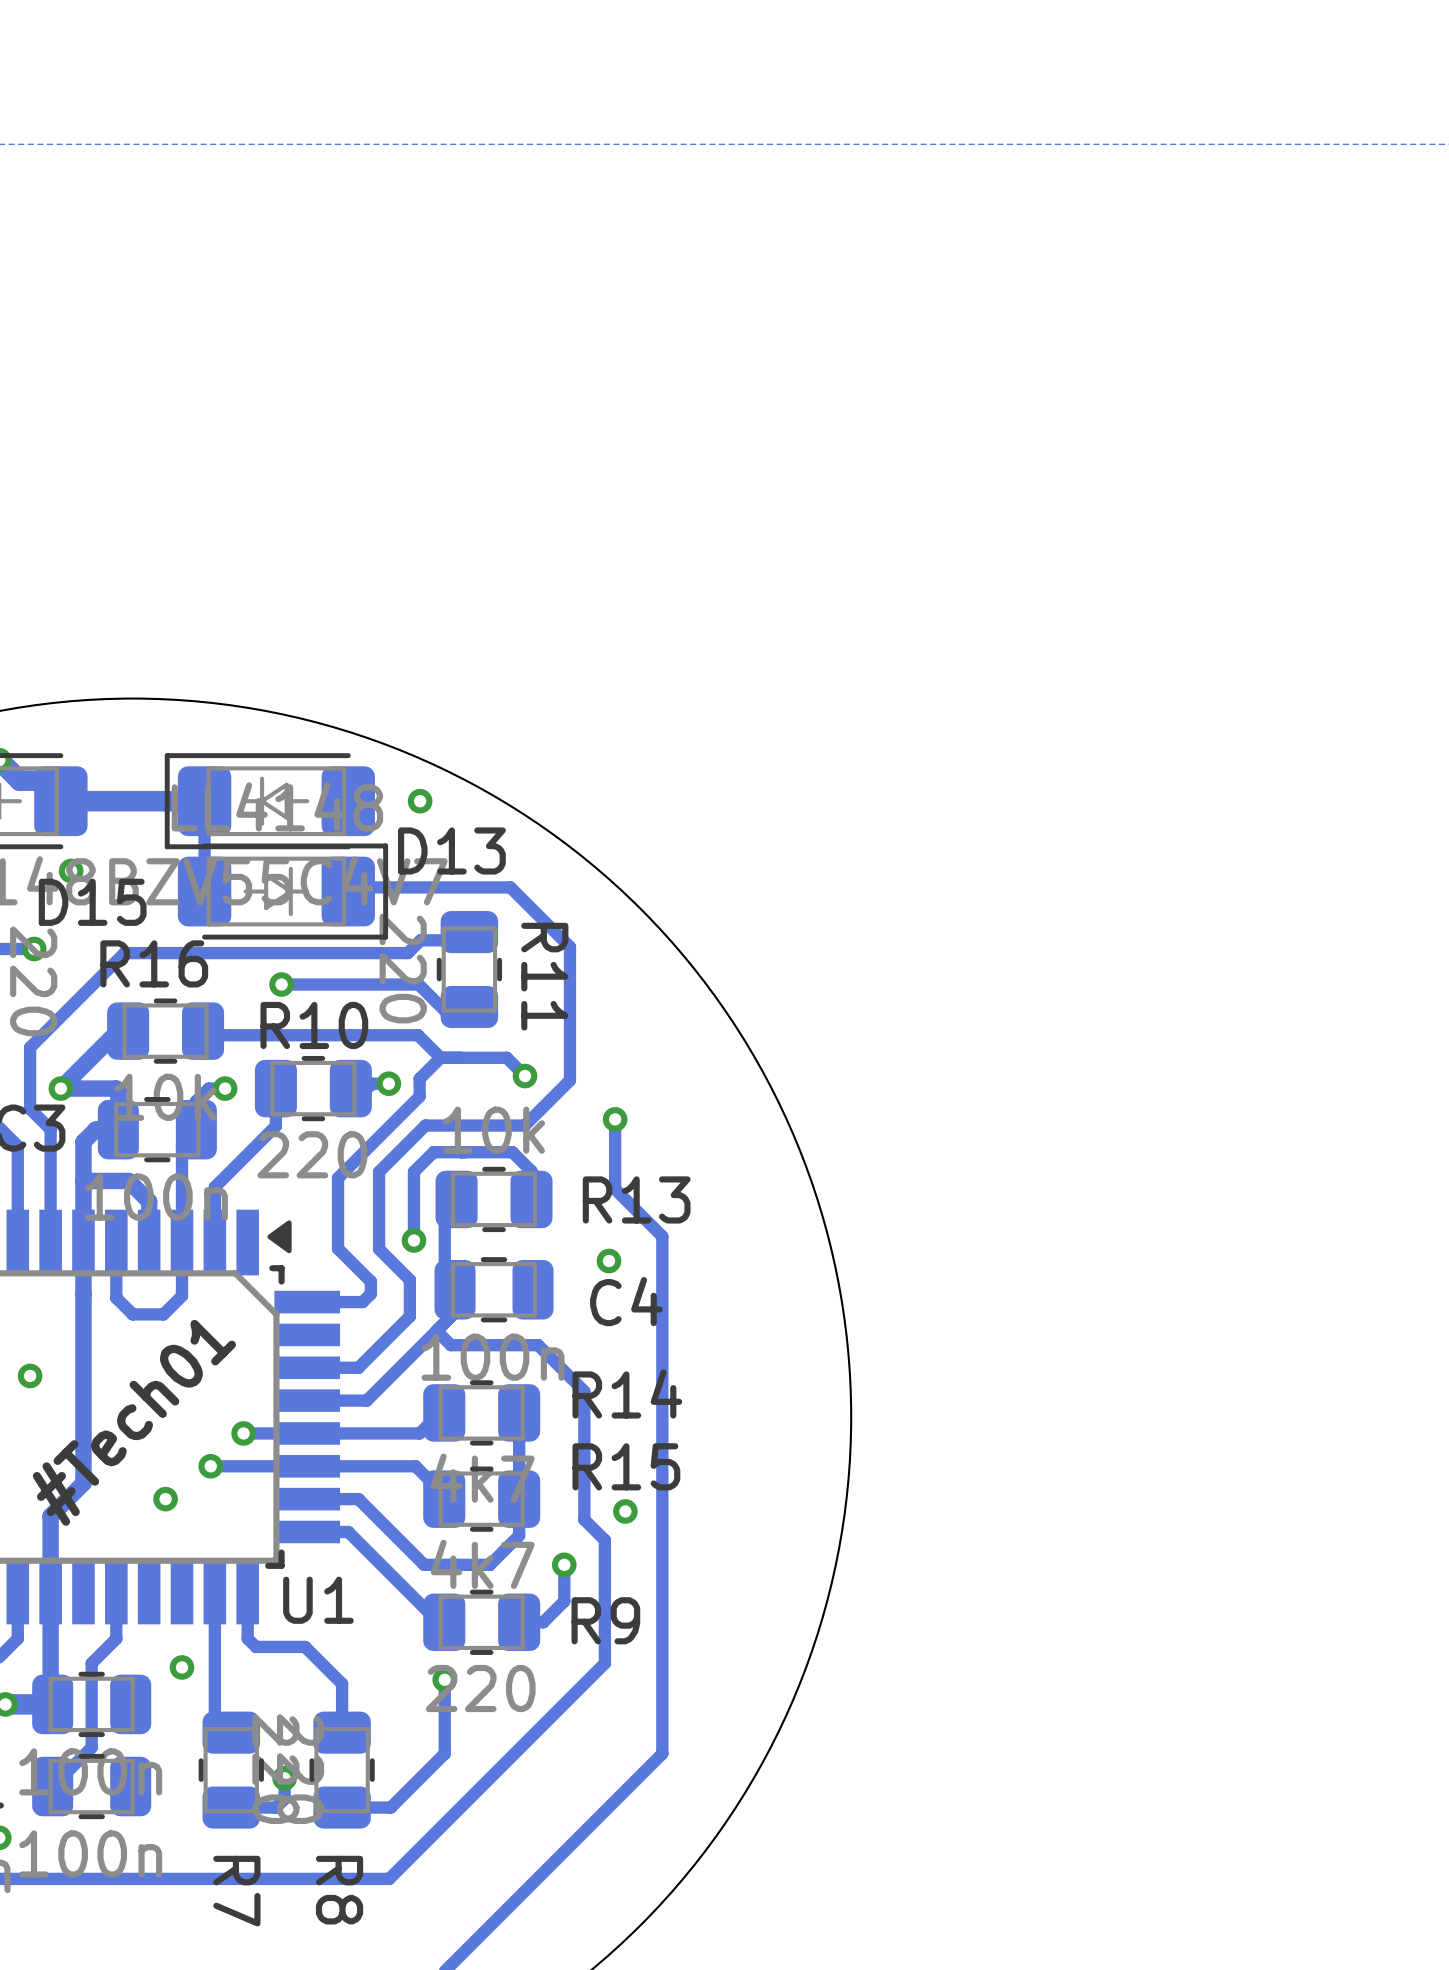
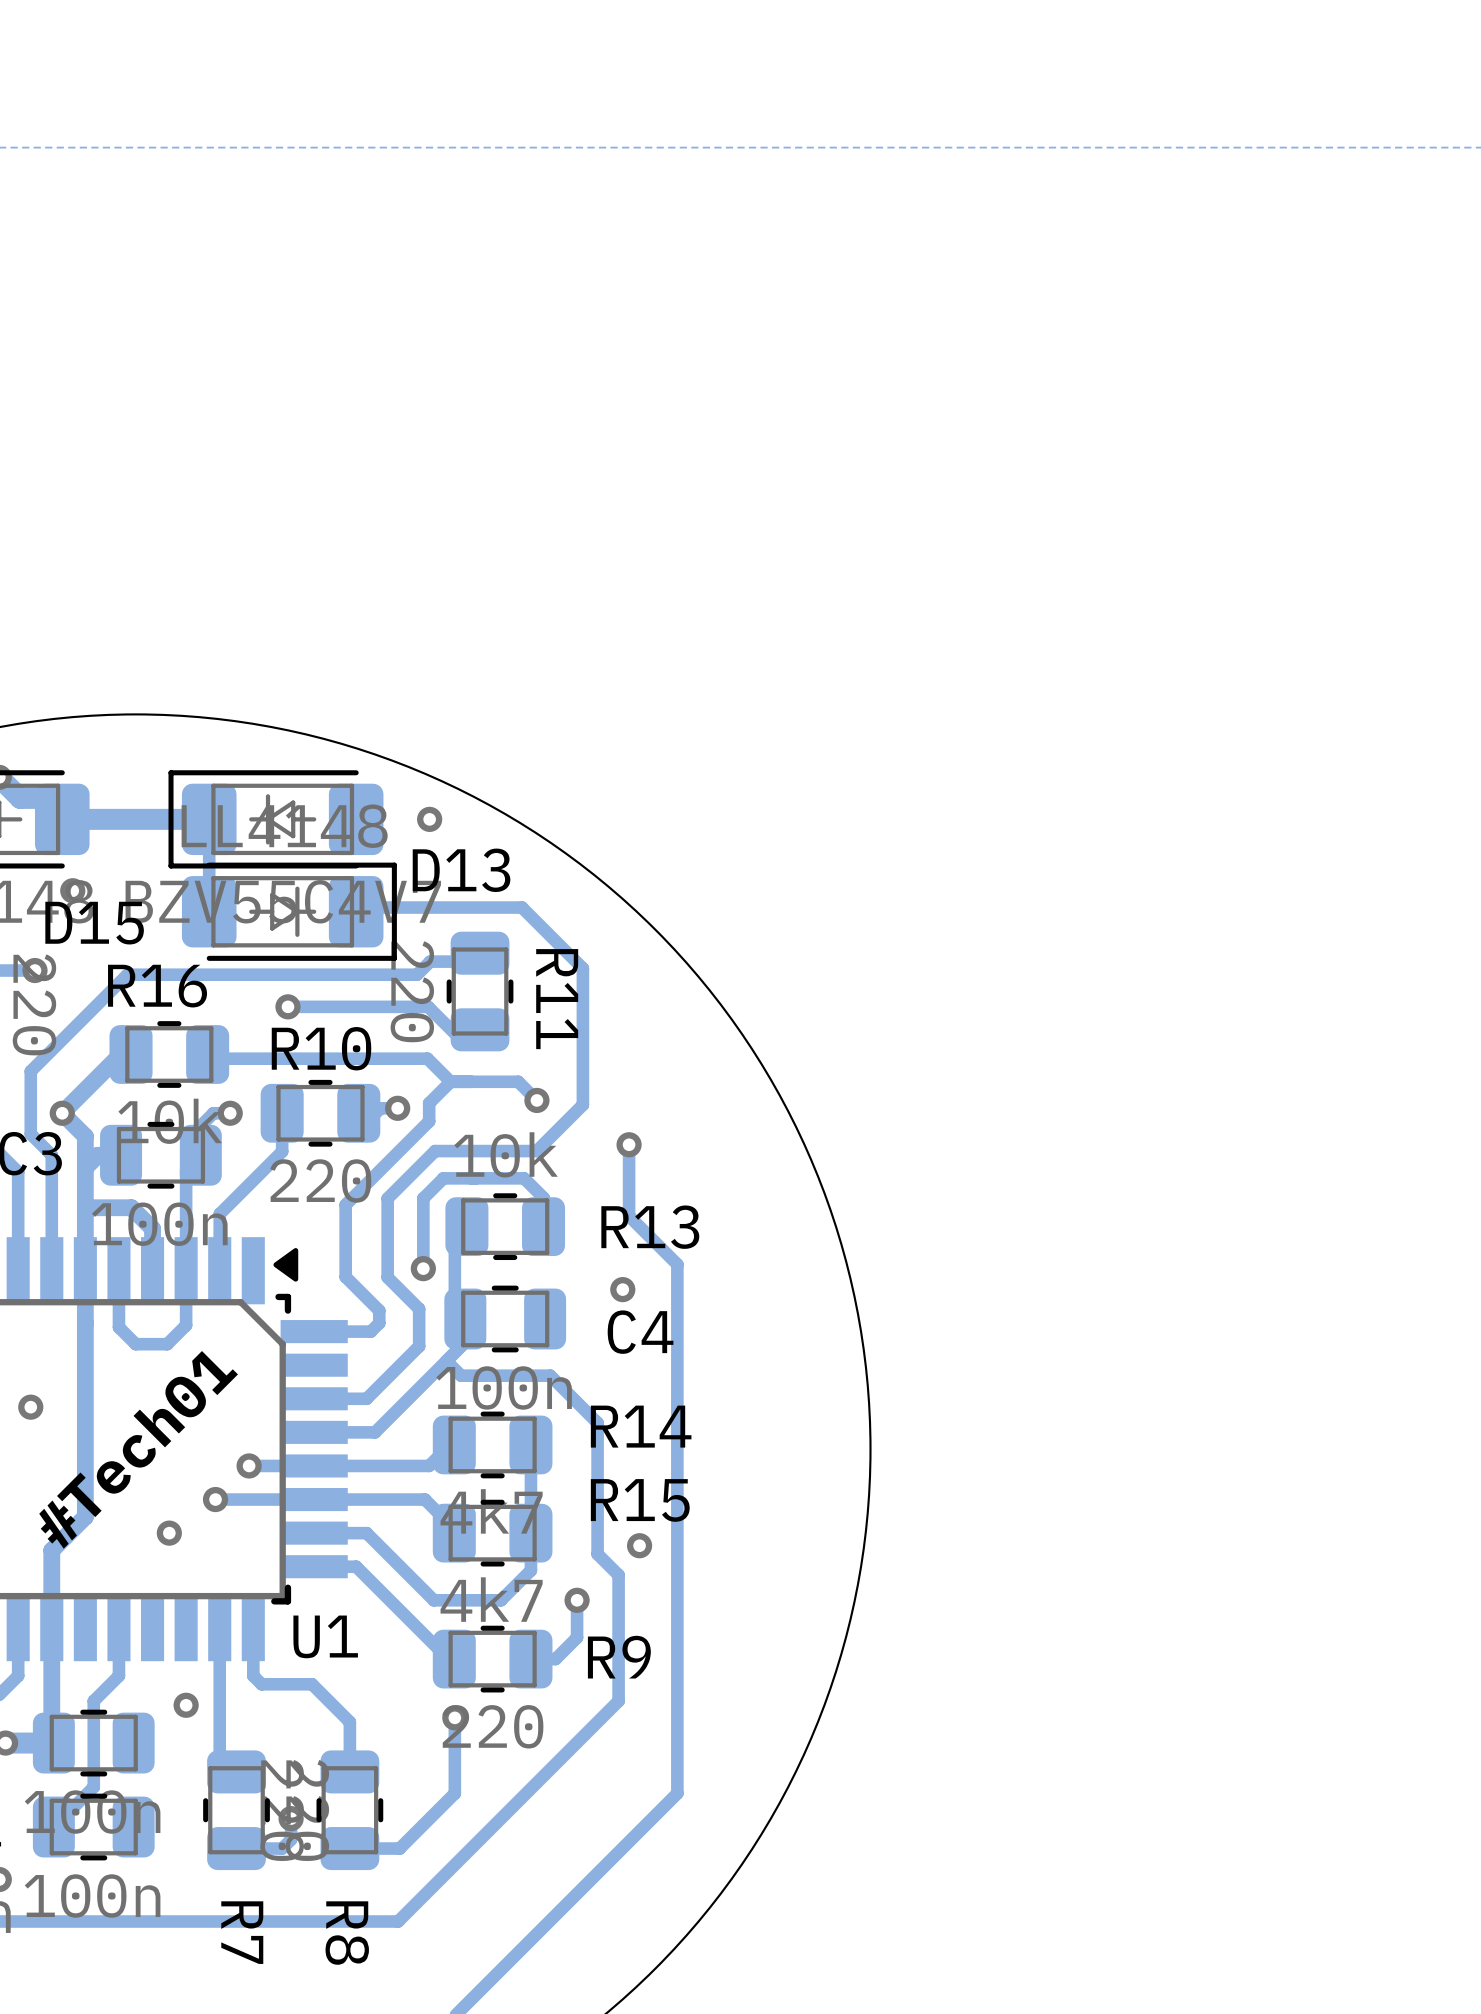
track: (60, 1088) (116, 1088) (118, 1090) (118, 1129) -> (62, 1113) (85, 1136) (85, 1167)

